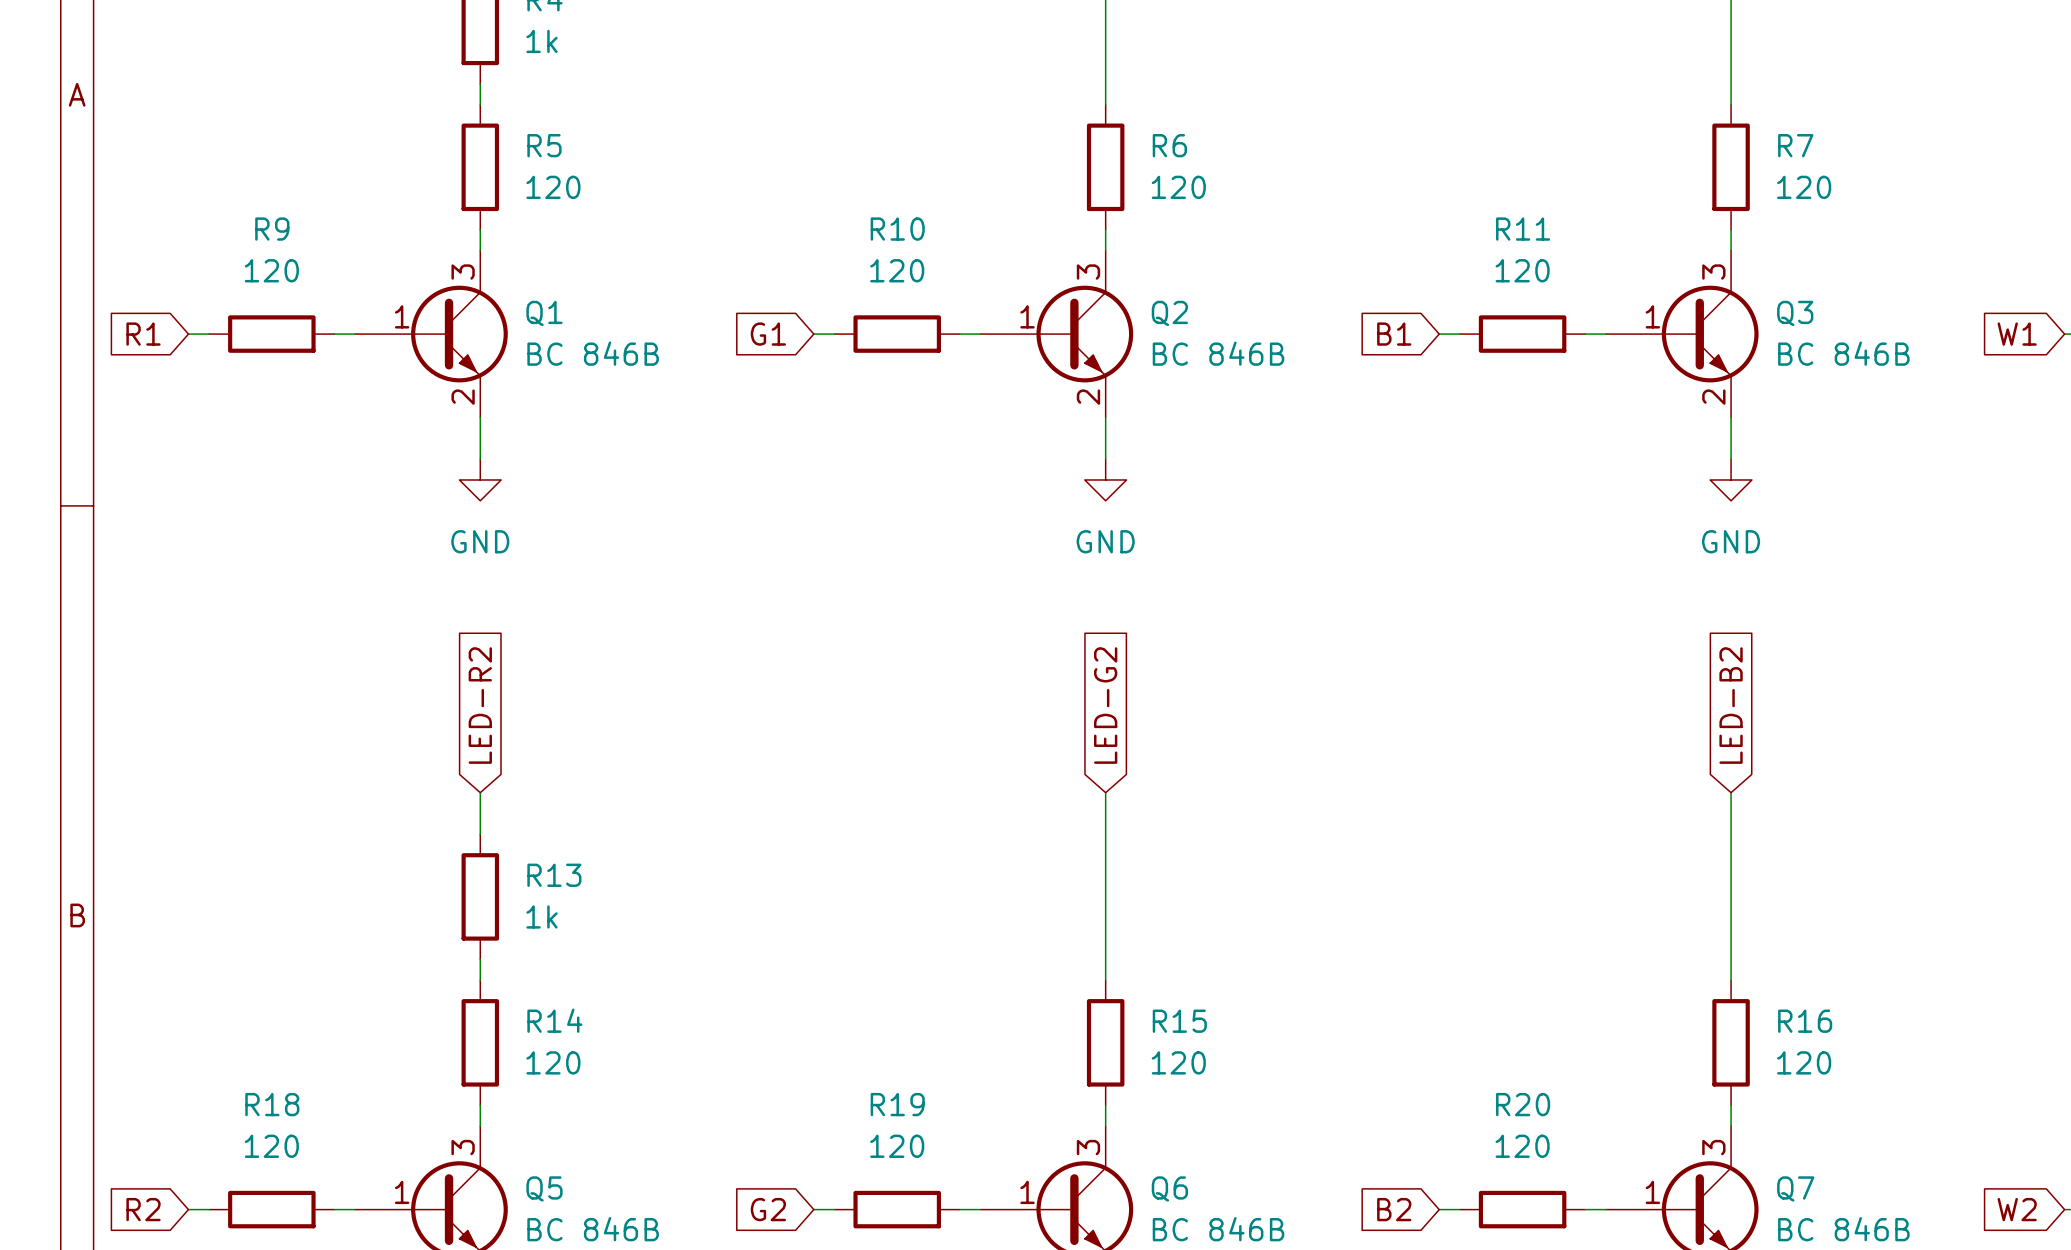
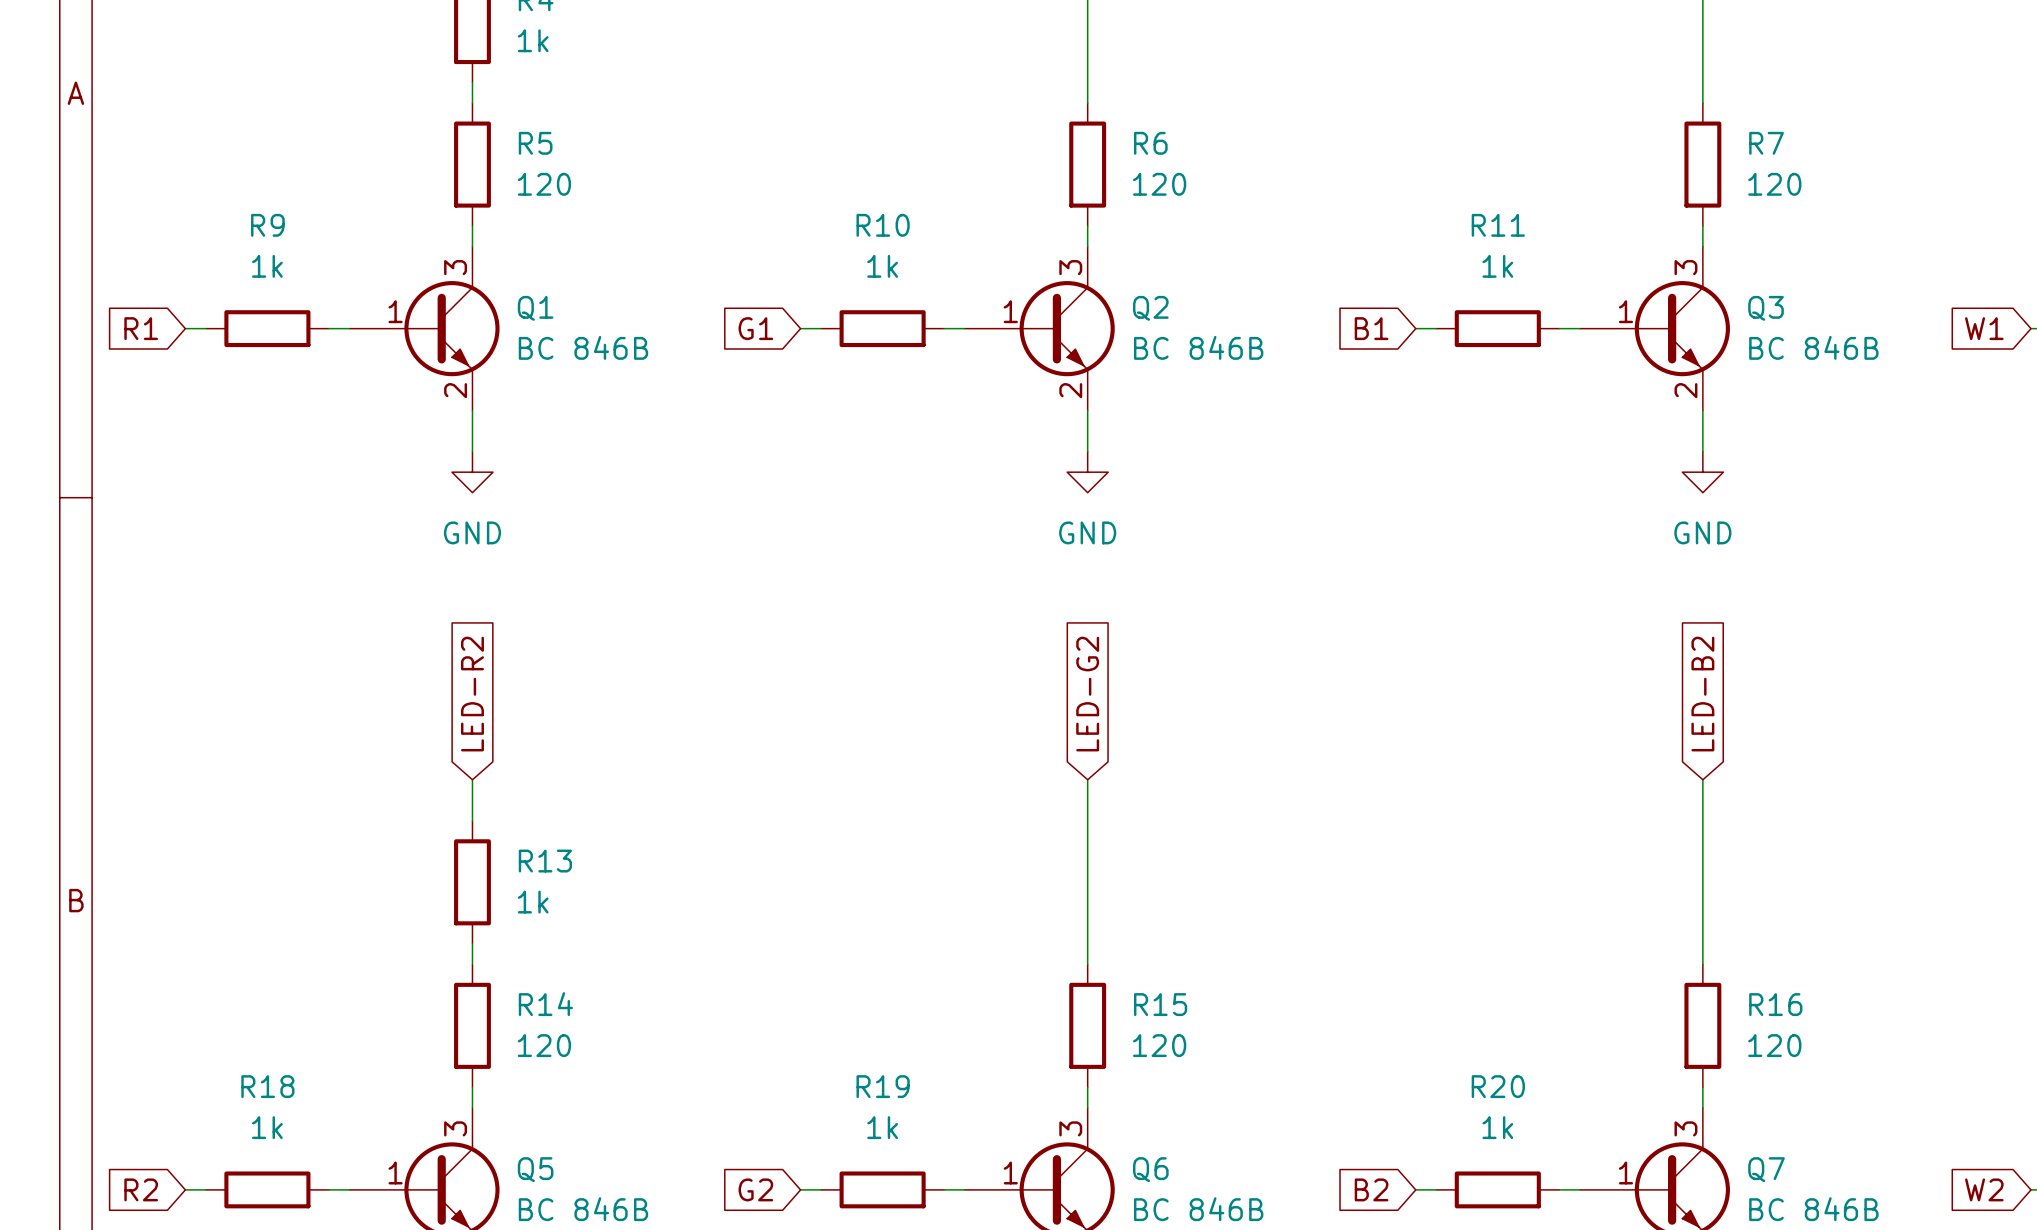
R9 value: 120 (271, 270) -> 1k (267, 266)
R10 value: 120 (897, 270) -> 1k (882, 266)
R11 value: 120 (1522, 270) -> 1k (1497, 266)
R18 value: 120 (271, 1146) -> 1k (267, 1127)
R19 value: 120 (897, 1146) -> 1k (882, 1127)
R20 value: 120 (1522, 1146) -> 1k (1497, 1127)

